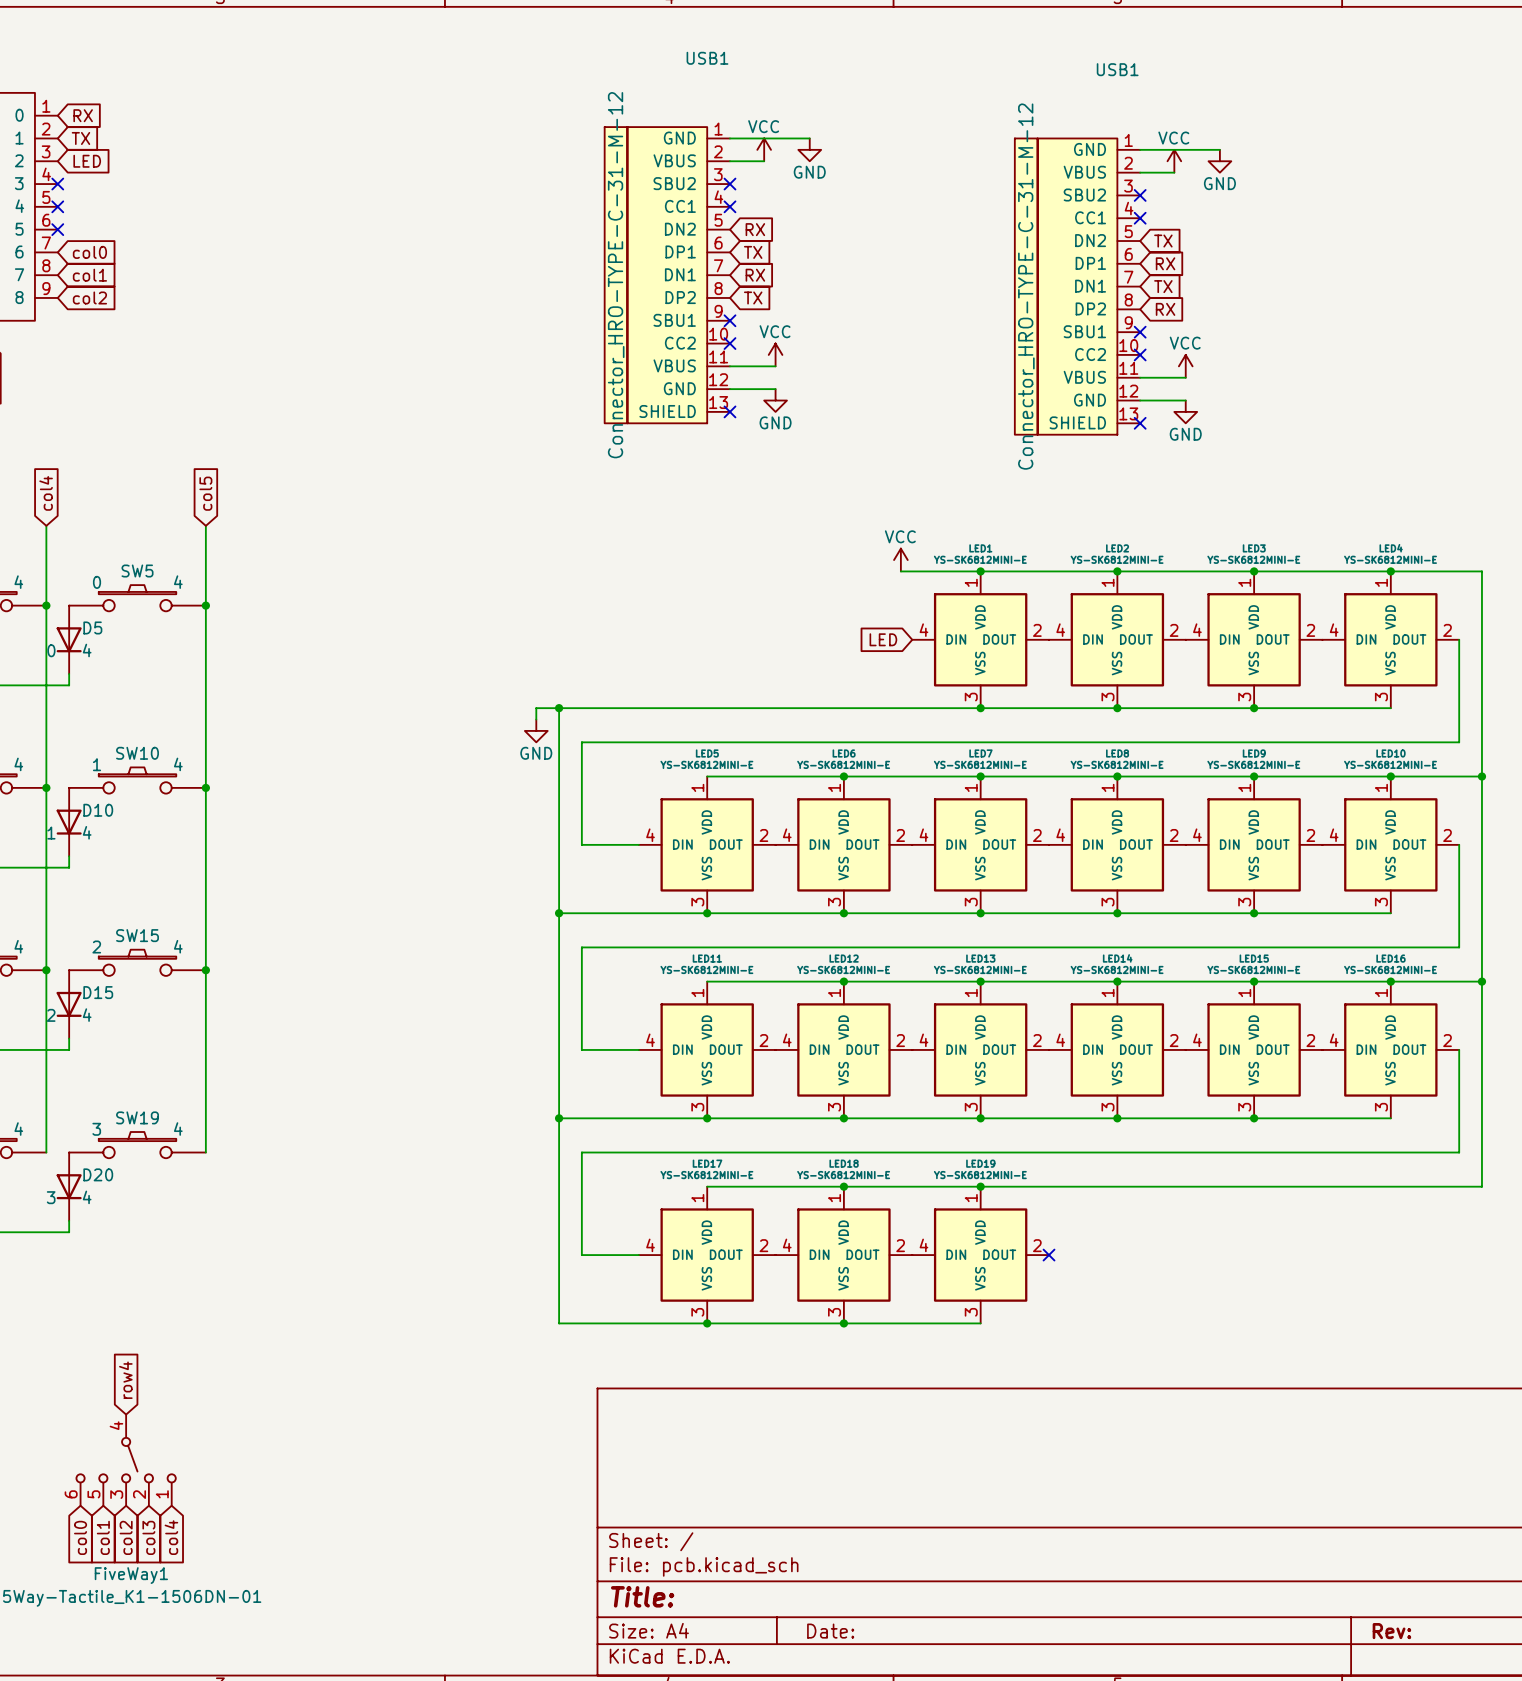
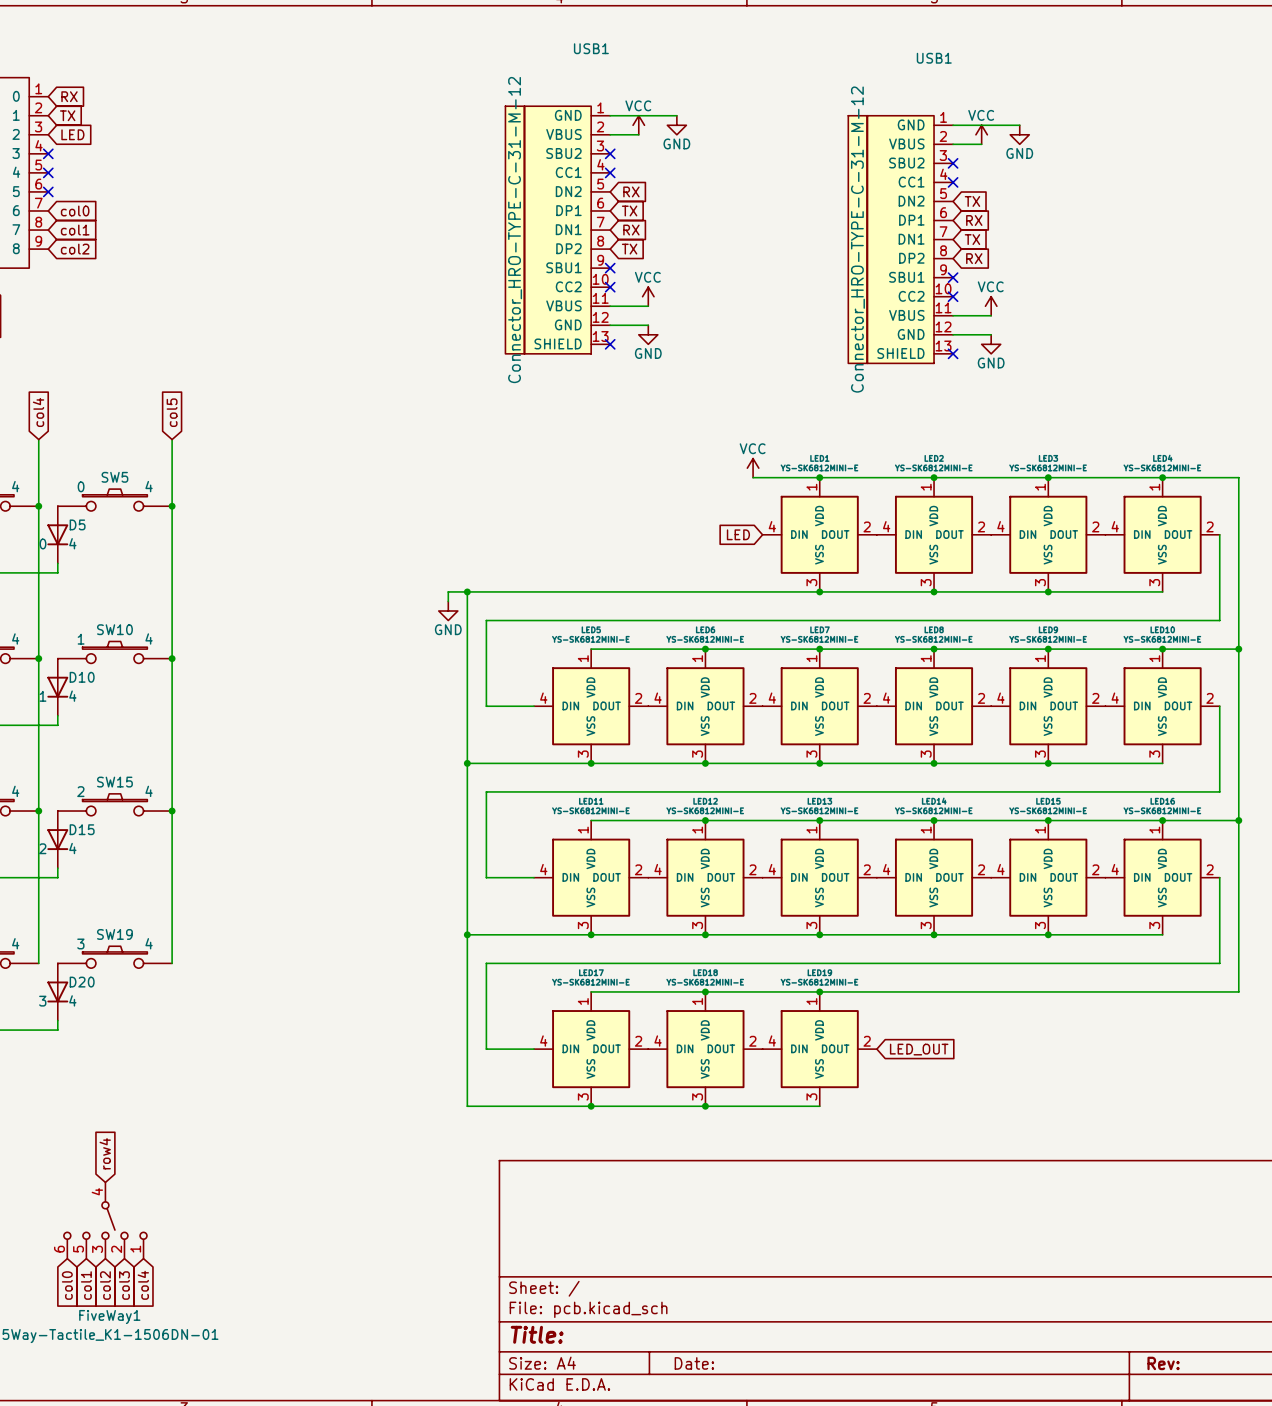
no-connect mark: (1049, 1255) -> none
global label: none -> LED_OUT (919, 1049)

